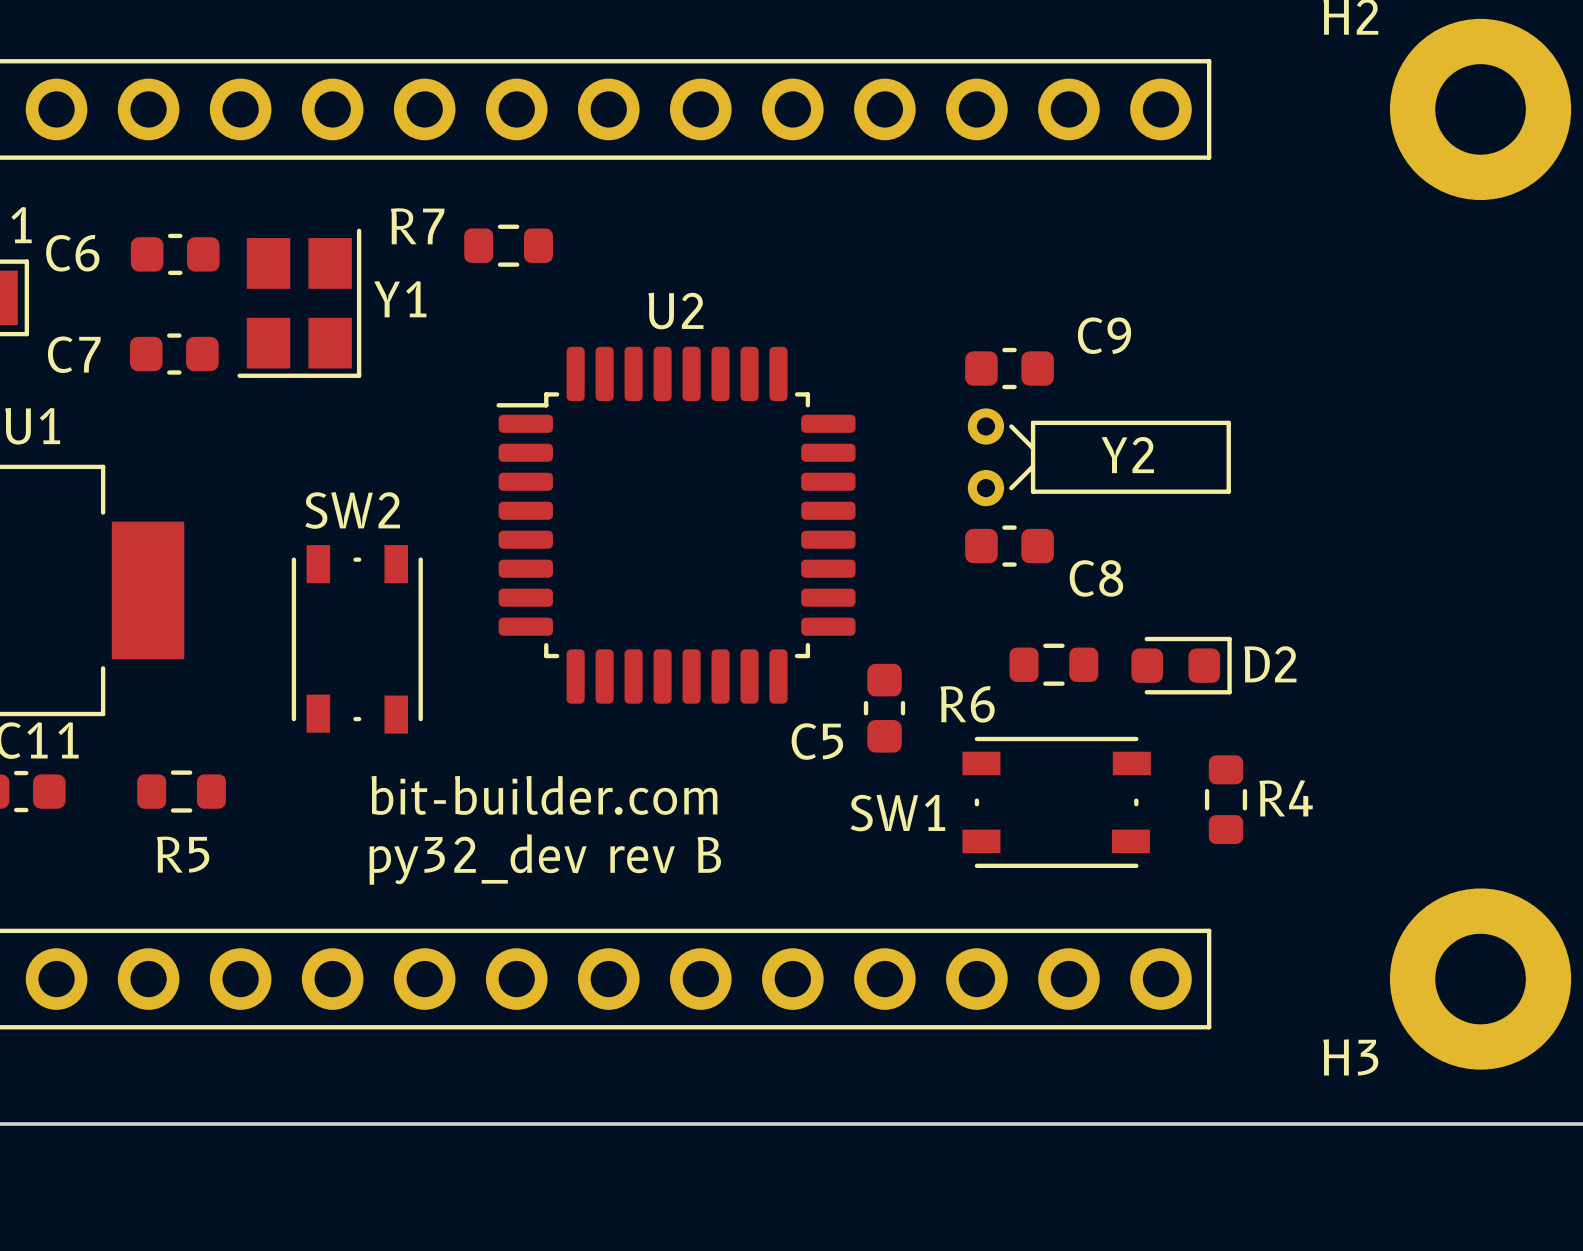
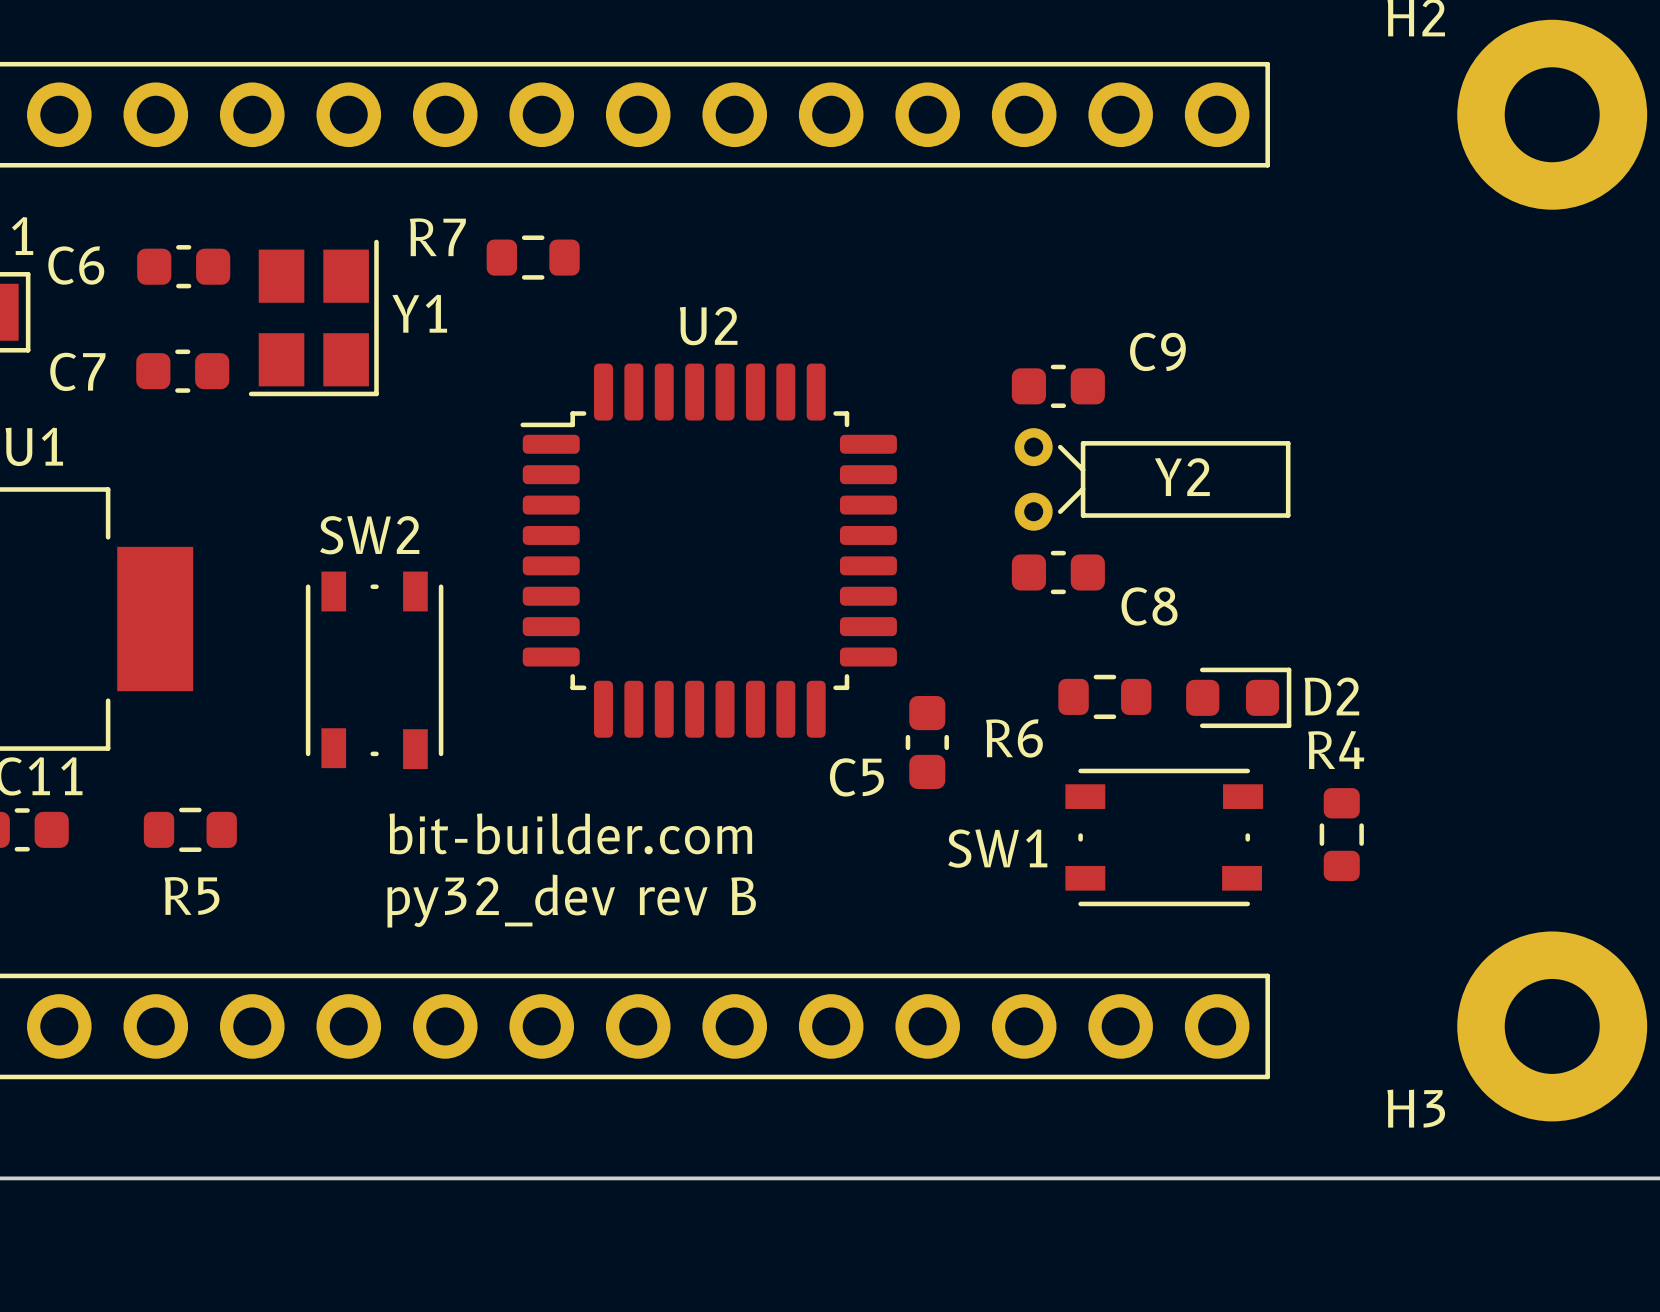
R4 name position: R4 (1286, 798) -> R4 (1336, 749)
R4 position: (1226, 799) -> (1341, 834)
SW1 position: (1056, 802) -> (1164, 837)

